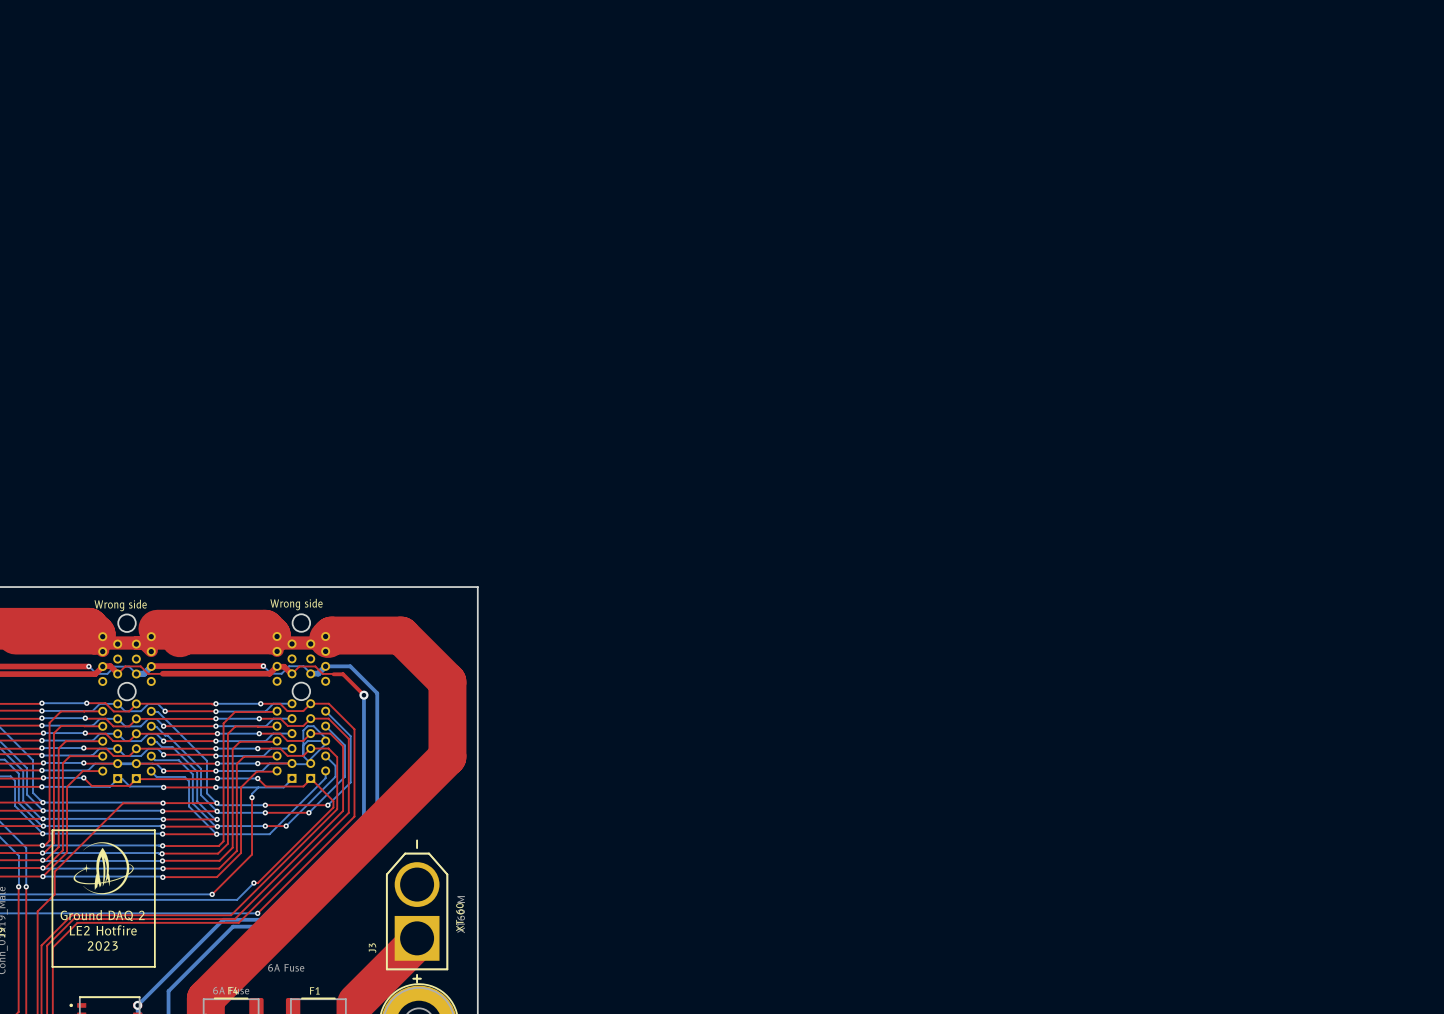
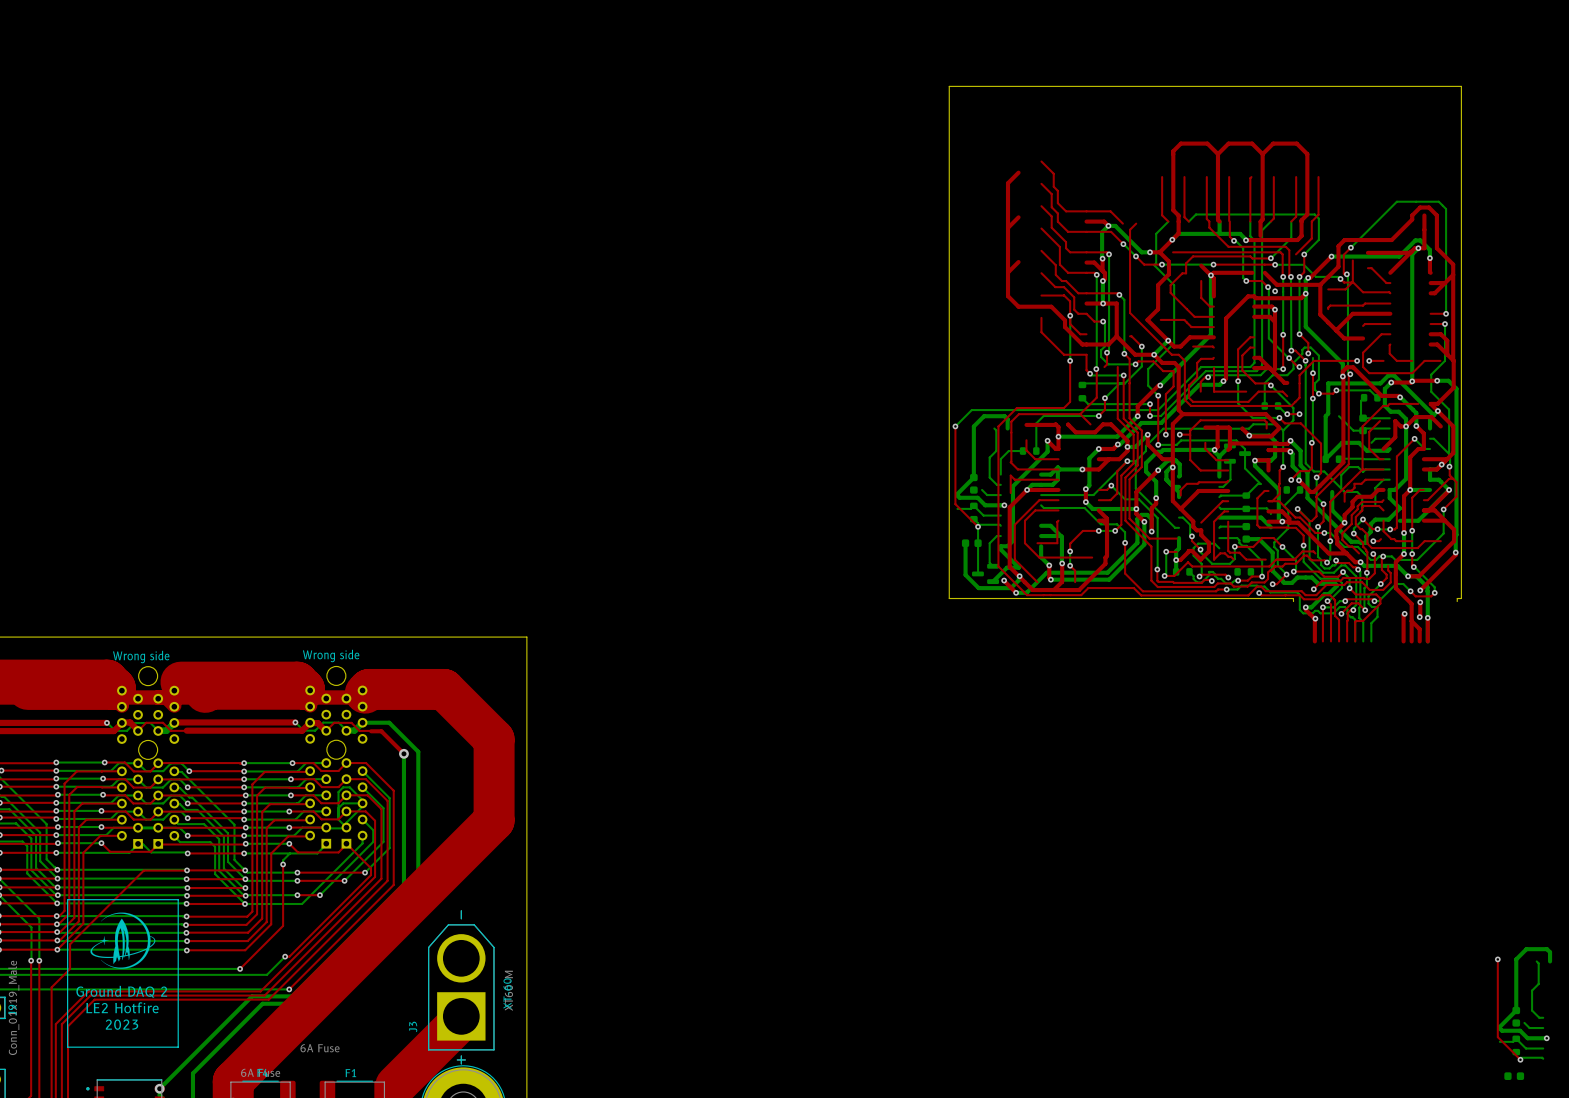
top track: none -> (1217, 154) (1207, 143) (1180, 143) (1173, 151) (1173, 210) (1178, 215) (1178, 233) (1159, 252)
top track: none -> (1217, 154) (1228, 143) (1252, 143) (1262, 154)
top track: none -> (1217, 154) (1217, 219) (1219, 221)
top track: none -> (1262, 154) (1273, 143) (1296, 143) (1307, 154) (1307, 214) (1301, 220) (1301, 235)
top track: none -> (1262, 154) (1262, 219) (1260, 221) (1260, 235)
top track: none -> (1041, 161) (1053, 173) (1053, 186) (1057, 190) (1057, 203) (1066, 211) (1110, 211) (1122, 223)
top track: none -> (1018, 172) (1008, 183) (1008, 296) (1018, 306) (1051, 306) (1065, 320) (1065, 327) (1082, 344) (1108, 344) (1116, 336)
top track: none -> (1162, 177) (1162, 215) (1168, 221)
top track: none -> (1184, 177) (1184, 217) (1188, 221)
top track: none -> (1206, 177) (1206, 219) (1209, 221) (1209, 227) (1228, 246) (1285, 246) (1289, 250) (1289, 275) (1290, 276)
top track: none -> (1229, 177) (1229, 220)
top track: none -> (1251, 177) (1250, 221)
top track: none -> (1273, 177) (1273, 218) (1270, 221)
top track: none -> (1296, 177) (1296, 216) (1291, 221)
top track: none -> (1318, 177) (1318, 214) (1311, 221) (1311, 238) (1295, 254)
top track: none -> (1041, 183) (1051, 194) (1051, 207) (1057, 213) (1057, 221) (1068, 231) (1111, 231) (1123, 244)
top track: none -> (1041, 206) (1051, 216) (1051, 227) (1066, 242) (1066, 248) (1070, 252) (1107, 252) (1109, 254)
top track: none -> (1424, 215) (1424, 248) (1414, 248) (1390, 272)
top track: none -> (1018, 217) (1008, 227)
top track: none -> (1086, 221) (1104, 221) (1108, 225)
bottom track: none -> (1168, 221) (1156, 233) (1156, 263) (1154, 265) (1174, 285) (1174, 343) (1148, 369) (1148, 385) (1158, 395)
bottom track: none -> (1188, 221) (1195, 214) (1314, 214) (1318, 218) (1318, 239) (1304, 254)
bottom track: none -> (1219, 221) (1219, 233)
top track: none -> (1229, 221) (1229, 236) (1234, 240)
bottom track: none -> (1250, 221) (1250, 236) (1254, 240) (1254, 362) (1250, 367) (1201, 367) (1158, 410) (971, 410) (955, 426)
bottom track: none -> (1270, 221) (1262, 230) (1262, 365) (1256, 371) (1205, 371) (1160, 415) (1150, 415)
bottom track: none -> (1291, 221) (1291, 238) (1270, 258)
top track: none -> (1136, 223) (1130, 229) (1130, 312) (1171, 354) (1178, 354) (1184, 360) (1184, 399) (1191, 405) (1291, 405) (1299, 397) (1299, 375) (1313, 360) (1357, 360)
via: none -> (1108, 225)
top track: none -> (1041, 228) (1059, 246) (1059, 264) (1068, 272) (1094, 272) (1096, 274)
top track: none -> (1301, 235) (1297, 240) (1246, 240)
bottom track: none -> (1172, 239) (1178, 233) (1240, 233) (1246, 240)
via: none -> (1172, 239)
via: none -> (1246, 240)
bottom track: none -> (1234, 240) (1243, 248) (1243, 277) (1246, 281)
via: none -> (1234, 240)
bottom track: none -> (1123, 244) (1135, 256)
via: none -> (1123, 244)
top track: none -> (1350, 247) (1343, 254) (1343, 273) (1346, 274)
bottom track: none -> (1350, 247) (1396, 201) (1438, 201) (1446, 208) (1446, 313)
via: none -> (1350, 247)
bottom track: none -> (1418, 248) (1412, 254) (1412, 381)
via: none -> (1418, 248)
top track: none -> (1041, 250) (1055, 265) (1055, 274) (1061, 281) (1066, 281) (1078, 293) (1117, 293) (1119, 294)
top track: none -> (1150, 252) (1159, 252)
bottom track: none -> (1150, 252) (1141, 252) (1115, 225) (1108, 225) (1102, 232) (1102, 258)
via: none -> (1150, 252)
top track: none -> (1159, 252) (1168, 261) (1168, 274) (1158, 285) (1158, 309) (1147, 319) (1174, 346) (1180, 346) (1189, 337) (1213, 337)
top track: none -> (1173, 252) (1280, 252) (1282, 254) (1283, 276)
top track: none -> (1367, 252) (1410, 252)
bottom track: none -> (1109, 254) (1109, 350) (1107, 352)
via: none -> (1109, 254)
top track: none -> (1304, 254) (1304, 272) (1299, 276)
via: none -> (1304, 254)
top track: none -> (1135, 256) (1144, 264) (1162, 264)
via: none -> (1135, 256)
top track: none -> (1331, 256) (1308, 277)
bottom track: none -> (1331, 256) (1399, 256) (1415, 240) (1420, 240) (1429, 249) (1429, 258)
via: none -> (1331, 256)
top track: none -> (1102, 258) (1102, 270)
via: none -> (1102, 258)
top track: none -> (1270, 258) (1193, 256) (1186, 263) (1186, 273) (1182, 273) (1170, 285) (1170, 292) (1194, 316) (1213, 316)
via: none -> (1270, 258)
top track: none -> (1429, 258) (1430, 272)
via: none -> (1429, 258)
top track: none -> (1352, 260) (1352, 282)
top track: none -> (1018, 262) (1008, 272)
top track: none -> (1086, 262) (1094, 262) (1104, 273) (1102, 281)
bottom track: none -> (1162, 264) (1213, 264)
via: none -> (1162, 264)
top track: none -> (1213, 264) (1275, 264)
via: none -> (1213, 264)
bottom track: none -> (1275, 264) (1303, 264) (1315, 276) (1338, 276) (1340, 278)
via: none -> (1275, 264)
top track: none -> (1201, 265) (1213, 278) (1213, 296)
top track: none -> (1367, 268) (1371, 268) (1386, 283) (1390, 283)
top track: none -> (1252, 272) (1213, 272) (1210, 275)
top track: none -> (1264, 272) (1276, 284) (1320, 284)
top track: none -> (1041, 273) (1055, 287) (1063, 287) (1074, 297) (1074, 309) (1078, 313) (1086, 313) (1094, 321) (1103, 321)
bottom track: none -> (1096, 274) (1096, 369)
via: none -> (1096, 274)
bottom track: none -> (1346, 274) (1347, 371) (1350, 374)
via: none -> (1346, 274)
top track: none -> (1453, 274) (1434, 293) (1430, 293)
bottom track: none -> (1210, 275) (1210, 334) (1160, 385)
via: none -> (1210, 275)
bottom track: none -> (1283, 276) (1283, 334)
via: none -> (1283, 276)
bottom track: none -> (1290, 276) (1291, 350)
via: none -> (1290, 276)
bottom track: none -> (1299, 276) (1299, 334)
via: none -> (1299, 276)
bottom track: none -> (1308, 277) (1305, 280) (1305, 326) (1342, 363) (1342, 376)
via: none -> (1308, 277)
top track: none -> (1340, 278) (1344, 282) (1352, 282)
via: none -> (1340, 278)
bottom track: none -> (1102, 281) (1103, 303)
via: none -> (1102, 281)
top track: none -> (1201, 281) (1201, 297) (1209, 306) (1213, 306)
top track: none -> (1246, 281) (1261, 281) (1268, 287)
via: none -> (1246, 281)
top track: none -> (1352, 282) (1345, 289) (1328, 289)
top track: none -> (1352, 282) (1363, 292) (1390, 293)
top track: none -> (1430, 283) (1445, 283)
top track: none -> (1320, 284) (1320, 314) (1344, 338) (1363, 338)
top track: none -> (1320, 284) (1338, 266) (1338, 246) (1344, 240) (1391, 240) (1412, 219) (1412, 215) (1420, 207) (1428, 207) (1436, 215) (1436, 248) (1453, 264) (1453, 360)
bottom track: none -> (1268, 287) (1268, 338) (1289, 358)
via: none -> (1268, 287)
via: none -> (1275, 291)
top track: none -> (1305, 293) (1301, 298) (1256, 298) (1248, 296) (1226, 318) (1226, 378) (1223, 381)
via: none -> (1305, 293)
top track: none -> (1041, 295) (1063, 295) (1070, 301) (1070, 324) (1080, 334) (1086, 334)
bottom track: none -> (1119, 294) (1124, 299) (1124, 353)
via: none -> (1119, 294)
top track: none -> (1086, 303) (1116, 303) (1116, 336)
via: none -> (1103, 303)
top track: none -> (1390, 303) (1330, 305) (1328, 309)
top track: none -> (1254, 306) (1271, 306) (1274, 309) (1274, 369) (1272, 371)
via: none -> (1274, 309)
top track: none -> (1390, 313) (1352, 313) (1336, 330)
top track: none -> (1430, 313) (1446, 313)
via: none -> (1446, 313)
bottom track: none -> (1070, 315) (1070, 360)
via: none -> (1070, 315)
top track: none -> (1254, 316) (1269, 316) (1274, 321)
top track: none -> (1041, 317) (1041, 332) (1063, 354) (1086, 354) (1086, 370) (1090, 373)
top track: none -> (1160, 319) (1184, 319) (1191, 327) (1213, 327)
bottom track: none -> (1103, 321) (1104, 323) (1104, 346) (1101, 350) (1101, 357) (1108, 364) (1135, 364)
via: none -> (1103, 321)
top track: none -> (1390, 324) (1365, 324) (1363, 325)
top track: none -> (1430, 324) (1445, 324)
bottom track: none -> (1445, 324) (1445, 360) (1431, 374) (1431, 391) (1449, 409) (1449, 453)
via: none -> (1445, 324)
top track: none -> (1299, 334) (1308, 342) (1308, 353)
via: none -> (1299, 334)
top track: none -> (1390, 334) (1381, 334) (1363, 352) (1363, 367) (1369, 373) (1412, 373) (1424, 360) (1440, 360)
top track: none -> (1430, 334) (1440, 334) (1447, 340) (1447, 354)
top track: none -> (1283, 334) (1283, 369)
via: none -> (1283, 334)
top track: none -> (1116, 336) (1135, 354) (1154, 354) (1162, 362) (1174, 362) (1178, 367) (1178, 410) (1182, 414)
top track: none -> (1130, 336) (1141, 346)
top track: none -> (1254, 337) (1250, 337) (1238, 349) (1238, 381)
bottom track: none -> (1168, 340) (1154, 354)
via: none -> (1168, 340)
top track: none -> (1390, 344) (1389, 353) (1396, 360) (1412, 360)
top track: none -> (1430, 344) (1437, 344) (1453, 360) (1453, 387) (1437, 403) (1430, 403) (1453, 426) (1453, 452) (1436, 469) (1423, 469)
bottom track: none -> (1141, 346) (1141, 366) (1124, 383) (1082, 384)
via: none -> (1141, 346)
top track: none -> (1193, 346) (1213, 347)
top track: none -> (1254, 347) (1250, 347) (1242, 355) (1242, 370) (1255, 383) (1268, 383) (1270, 385)
top track: none -> (1291, 350) (1295, 350) (1305, 360)
via: none -> (1291, 350)
top track: none -> (1107, 352) (1107, 364) (1104, 367)
via: none -> (1107, 352)
top track: none -> (1124, 353) (1129, 359) (1129, 383)
via: none -> (1124, 353)
via: none -> (1308, 353)
via: none -> (1154, 354)
top track: none -> (1213, 357) (1201, 358) (1197, 362) (1197, 377) (1188, 385) (1188, 397) (1193, 401) (1248, 401) (1258, 391) (1282, 391) (1287, 396)
top track: none -> (1254, 357) (1259, 357) (1284, 382) (1287, 382)
top track: none -> (1289, 358) (1299, 366)
via: none -> (1289, 358)
bottom track: none -> (1312, 357) (1312, 373)
top track: none -> (1070, 360) (1070, 401) (1063, 408) (1016, 408) (998, 426) (998, 566) (1026, 595) (1081, 595) (1088, 588) (1133, 588) (1141, 595) (1248, 595) (1257, 586) (1261, 586) (1265, 591) (1301, 591) (1305, 595) (1316, 595) (1326, 584) (1344, 584) (1347, 582) (1362, 582) (1369, 589) (1383, 589) (1390, 582) (1388, 565)
via: none -> (1070, 360)
via: none -> (1305, 360)
via: none -> (1357, 360)
top track: none -> (1369, 360) (1383, 360)
via: none -> (1369, 360)
top track: none -> (1135, 364) (1138, 361) (1153, 361) (1163, 371) (1173, 371) (1173, 386) (1165, 394) (1165, 434)
via: none -> (1135, 364)
bottom track: none -> (1305, 364) (1305, 463) (1313, 471) (1324, 471) (1344, 492) (1357, 492) (1362, 496) (1362, 509) (1360, 511)
top track: none -> (1117, 367) (1117, 418) (1133, 434) (1133, 463) (1121, 475) (1121, 524) (1115, 530)
via: none -> (1299, 366)
top track: none -> (1213, 368) (1214, 391) (1246, 391)
top track: none -> (1254, 368) (1269, 368)
top track: none -> (1096, 369) (1096, 397) (1080, 414)
via: none -> (1096, 369)
bottom track: none -> (1283, 369) (1266, 369) (1260, 375) (1210, 375) (1208, 377)
via: none -> (1283, 369)
top track: none -> (1312, 373) (1312, 398)
via: none -> (1312, 373)
bottom track: none -> (1090, 373) (1091, 375) (1123, 375)
via: none -> (1090, 373)
top track: none -> (1350, 374) (1348, 372) (1348, 464) (1316, 496) (1316, 516) (1311, 521) (1297, 509)
via: none -> (1350, 374)
top track: none -> (1123, 375) (1123, 418) (1137, 432) (1137, 465) (1125, 477) (1125, 520) (1151, 546) (1151, 580) (1157, 587) (1160, 587)
via: none -> (1123, 375)
via: none -> (1342, 376)
top track: none -> (1208, 377) (1200, 381) (1200, 391)
via: none -> (1208, 377)
top track: none -> (1437, 380) (1391, 382)
bottom track: none -> (1437, 380) (1448, 380) (1456, 388) (1455, 552)
via: none -> (1437, 380)
bottom track: none -> (1223, 381) (1219, 384) (1199, 384) (1161, 422) (1141, 422) (1120, 444) (1117, 444)
via: none -> (1223, 381)
bottom track: none -> (1238, 381) (1238, 403) (1252, 417) (1279, 417)
via: none -> (1238, 381)
via: none -> (1412, 381)
bottom track: none -> (1391, 382) (1384, 388) (1384, 405) (1390, 411) (1398, 411) (1406, 419) (1406, 478) (1395, 489) (1389, 489) (1389, 498) (1399, 508) (1388, 519) (1375, 519) (1370, 524) (1370, 532) (1366, 536) (1366, 542) (1351, 541) (1307, 497) (1307, 472) (1300, 465) (1300, 450) (1290, 440)
via: none -> (1391, 382)
bottom track: none -> (1119, 383) (1104, 398)
top track: none -> (1129, 383) (1129, 418) (1141, 430) (1141, 467) (1129, 479) (1129, 518) (1149, 538) (1176, 538)
top track: none -> (1160, 385) (1137, 406) (1137, 416)
via: none -> (1160, 385)
bottom track: none -> (1270, 385) (1293, 408) (1293, 420) (1283, 430)
via: none -> (1270, 385)
top track: none -> (1336, 390) (1333, 393) (1318, 393)
bottom track: none -> (1336, 390) (1370, 390) (1377, 397)
via: none -> (1336, 390)
part: none -> (1082, 391)
bottom track: none -> (1318, 393) (1314, 389) (1314, 383) (1318, 379) (1318, 355) (1310, 347) (1304, 347) (1302, 354) (1293, 362) (1293, 368) (1287, 375) (1272, 375) (1264, 383) (1264, 405)
via: none -> (1318, 393)
top track: none -> (1158, 395) (1158, 444)
via: none -> (1158, 395)
bottom track: none -> (1082, 398) (1088, 404) (1150, 404)
top track: none -> (1104, 398) (1104, 409) (1098, 415)
via: none -> (1104, 398)
bottom track: none -> (1364, 397) (1361, 400) (1361, 416) (1363, 418) (1389, 418)
part: none -> (1370, 397)
top track: none -> (1400, 397) (1381, 395) (1353, 367) (1346, 367) (1342, 371) (1343, 462) (1313, 491) (1310, 491) (1298, 480)
bottom track: none -> (1400, 397) (1416, 413) (1416, 426)
via: none -> (1400, 397)
bottom track: none -> (1312, 398) (1311, 442)
via: none -> (1312, 398)
top track: none -> (1150, 404) (1150, 415)
via: none -> (1150, 404)
top track: none -> (1418, 403) (1389, 403) (1383, 405) (1362, 426) (1362, 469)
part: none -> (1271, 405)
bottom track: none -> (1278, 405) (1287, 414)
bottom track: none -> (1437, 411) (1430, 418) (1430, 428)
via: none -> (1437, 411)
top track: none -> (1080, 414) (1018, 414) (1011, 421) (1010, 462) (1017, 469) (1058, 469)
top track: none -> (1080, 414) (1090, 424)
top track: none -> (1182, 414) (1172, 424) (1172, 500) (1193, 521) (1193, 526) (1196, 530) (1201, 530) (1201, 535) (1208, 542) (1208, 551) (1200, 559) (1192, 550) (1188, 550) (1180, 560) (1176, 560)
top track: none -> (1182, 414) (1265, 414) (1279, 427)
top track: none -> (1287, 414) (1299, 414)
via: none -> (1287, 414)
via: none -> (1299, 414)
bottom track: none -> (1433, 415) (1394, 375) (1388, 375) (1380, 383) (1328, 383) (1325, 459) (1342, 442) (1358, 442) (1366, 450) (1387, 450) (1389, 448)
bottom track: none -> (1098, 415) (1043, 415) (1036, 423) (1036, 451)
via: none -> (1098, 415)
bottom track: none -> (1137, 416) (1117, 436) (1058, 436)
via: none -> (1137, 416)
via: none -> (1150, 415)
bottom track: none -> (1338, 416) (1353, 430) (1389, 428)
top track: none -> (1279, 417) (1284, 423) (1300, 423) (1321, 443) (1321, 473) (1316, 477)
via: none -> (1279, 417)
top track: none -> (1379, 421) (1369, 431) (1369, 448) (1379, 459) (1383, 459)
top track: none -> (1026, 424) (1055, 424) (1058, 427) (1058, 448) (1055, 448) (1047, 440)
top track: none -> (1068, 424) (1075, 432) (1095, 432) (1103, 424) (1111, 424) (1127, 440) (1127, 451) (1119, 459) (1098, 459)
part: none -> (1363, 424)
top track: none -> (955, 426) (955, 504) (978, 526)
via: none -> (955, 426)
via: none -> (1406, 426)
top track: none -> (1416, 426) (1423, 433) (1423, 448) (1418, 448) (1410, 457) (1410, 489) (1404, 496) (1404, 532)
via: none -> (1416, 426)
top track: none -> (1440, 426) (1431, 417) (1415, 417) (1406, 426) (1400, 426) (1395, 421) (1395, 437) (1383, 448)
top track: none -> (1205, 427) (1228, 427) (1229, 448) (1228, 450)
top track: none -> (1217, 427) (1217, 446) (1214, 449)
bottom track: none -> (994, 428) (996, 430) (996, 451) (989, 457) (989, 477) (996, 484) (1000, 484)
bottom track: none -> (1007, 428) (1007, 419) (1004, 416) (984, 416) (973, 426) (973, 477) (957, 493) (959, 497) (977, 497) (985, 505) (1004, 505)
top track: none -> (1242, 428) (1250, 436) (1271, 436) (1279, 428)
top track: none -> (1266, 428) (1264, 420) (1200, 420) (1190, 430) (1190, 459) (1200, 470) (1228, 470)
bottom track: none -> (1283, 430) (1276, 424) (1253, 424) (1248, 428) (1163, 428) (1145, 446) (1145, 451) (1135, 461)
bottom track: none -> (1283, 430) (1283, 467)
top track: none -> (1147, 434) (1147, 444) (1162, 459) (1172, 459)
bottom track: none -> (1147, 434) (1135, 446) (1127, 446)
via: none -> (1147, 434)
via: none -> (1165, 434)
top track: none -> (1179, 434) (1190, 435)
via: none -> (1179, 434)
bottom track: none -> (1249, 435) (1269, 435) (1275, 441) (1275, 456) (1271, 460) (1254, 460) (1254, 465) (1278, 489) (1278, 519)
via: none -> (1249, 435)
via: none -> (1058, 436)
bottom track: none -> (1389, 438) (1375, 438) (1371, 442)
top track: none -> (1414, 438) (1396, 456) (1396, 527) (1390, 529)
bottom track: none -> (1414, 438) (1424, 448) (1430, 448)
via: none -> (1414, 438)
bottom track: none -> (1430, 438) (1433, 438) (1451, 455) (1449, 466)
top track: none -> (1026, 440) (1026, 450) (1035, 459) (1058, 459)
bottom track: none -> (1047, 440) (1047, 451) (1012, 486) (1012, 540) (1007, 546) (1000, 546) (1000, 549) (1018, 567) (1006, 567) (993, 581)
via: none -> (1047, 440)
top track: none -> (1290, 440) (1287, 443) (1229, 442)
via: none -> (1290, 440)
top track: none -> (1205, 442) (1205, 448) (1216, 460) (1228, 460)
top track: none -> (1311, 442) (1311, 468) (1308, 471) (1299, 471) (1291, 479)
via: none -> (1311, 442)
top track: none -> (1117, 444) (1113, 448) (1098, 448)
via: none -> (1117, 444)
bottom track: none -> (1158, 444) (1176, 444) (1181, 440) (1236, 440) (1245, 449) (1245, 468) (1260, 484) (1257, 484) (1246, 495) (1219, 497)
via: none -> (1158, 444)
via: none -> (1127, 446)
bottom track: none -> (1229, 445) (1219, 456)
bottom track: none -> (1098, 448) (1089, 458) (1089, 485) (1085, 489)
via: none -> (1098, 448)
bottom track: none -> (1178, 449) (1214, 449) (1219, 456)
bottom track: none -> (1178, 450) (1157, 451) (1146, 463) (1146, 471) (1156, 481) (1156, 498)
via: none -> (1214, 449)
top track: none -> (1268, 450) (1290, 451)
bottom track: none -> (1023, 451) (1008, 451) (1000, 459) (1000, 474)
part: none -> (1029, 451)
bottom track: none -> (1290, 451) (1292, 453) (1292, 466) (1298, 472) (1298, 480)
via: none -> (1290, 451)
part: none -> (1237, 453)
bottom track: none -> (1219, 456) (1219, 476)
top track: none -> (1109, 459) (1098, 469) (1082, 469)
part: none -> (1332, 459)
bottom track: none -> (1338, 459) (1389, 459)
top track: none -> (1423, 459) (1447, 459)
top track: none -> (1254, 460) (1268, 460) (1268, 470)
via: none -> (1254, 460)
top track: none -> (1127, 461) (1117, 471) (1117, 493) (1110, 500) (1098, 500)
via: none -> (1127, 461)
bottom track: none -> (1135, 461) (1135, 488) (1175, 527) (1179, 527)
bottom track: none -> (1135, 461) (1127, 461) (1093, 495) (1041, 495)
bottom track: none -> (1229, 461) (1230, 479) (1223, 486) (1219, 486)
bottom track: none -> (1441, 464) (1436, 469) (1430, 469) (1430, 479) (1438, 479) (1449, 489) (1418, 520) (1399, 520)
via: none -> (1441, 464)
bottom track: none -> (1057, 467) (1059, 469) (1082, 469)
bottom track: none -> (1057, 467) (1057, 479) (1052, 484) (1032, 484) (1027, 489)
bottom track: none -> (1057, 467) (1050, 474) (1041, 474)
bottom track: none -> (1172, 467) (1166, 471) (1166, 479) (1179, 492) (1179, 497)
via: none -> (1172, 467)
top track: none -> (1283, 467) (1279, 470) (1279, 493) (1272, 501)
via: none -> (1283, 467)
top track: none -> (1449, 466) (1449, 475) (1453, 478)
via: none -> (1449, 466)
via: none -> (1082, 469)
top track: none -> (1362, 469) (1383, 469)
top track: none -> (1362, 469) (1330, 501) (1330, 541)
bottom track: none -> (1389, 469) (1365, 469) (1363, 472) (1358, 467) (1349, 467) (1341, 475) (1341, 488)
top track: none -> (1158, 470) (1136, 492) (1136, 513) (1144, 521)
bottom track: none -> (1158, 470) (1167, 460) (1175, 460) (1179, 464) (1179, 476)
via: none -> (1158, 470)
bottom track: none -> (1316, 477) (1316, 497) (1323, 504)
via: none -> (1316, 477)
top track: none -> (1453, 478) (1456, 482) (1456, 496) (1443, 509)
top track: none -> (1453, 478) (1449, 478) (1427, 500) (1423, 500)
top track: none -> (1058, 479) (1014, 479) (1010, 475) (1010, 493)
via: none -> (1291, 479)
via: none -> (1298, 480)
top track: none -> (1383, 479) (1365, 479) (1361, 483) (1354, 483) (1354, 487) (1351, 490) (1347, 490) (1344, 493) (1344, 501)
bottom track: none -> (1389, 479) (1383, 479) (1375, 487) (1375, 504)
top track: none -> (1228, 480) (1186, 483) (1180, 489) (1180, 495)
part: none -> (973, 483)
top track: none -> (1111, 485) (1107, 489) (1098, 489)
bottom track: none -> (1111, 485) (1124, 499) (1138, 499) (1157, 518) (1157, 569)
via: none -> (1111, 485)
bottom track: none -> (1173, 486) (1179, 486)
bottom track: none -> (982, 489) (987, 495) (1000, 495)
via: none -> (1027, 489)
top track: none -> (1058, 489) (1027, 489) (1009, 507) (1009, 566) (1032, 590) (1041, 590)
top track: none -> (1085, 489) (1085, 502)
via: none -> (1085, 489)
part: none -> (1293, 489)
bottom track: none -> (1300, 489) (1283, 506) (1288, 510) (1288, 528) (1274, 542) (1274, 547) (1277, 550) (1277, 565) (1286, 574)
top track: none -> (1383, 489) (1378, 489) (1371, 496) (1357, 496) (1352, 501) (1352, 507) (1344, 515) (1344, 522) (1336, 530) (1337, 544) (1355, 562) (1360, 562)
bottom track: none -> (1410, 489) (1430, 489)
via: none -> (1410, 489)
top track: none -> (1423, 489) (1420, 489) (1412, 497) (1412, 530)
top track: none -> (1449, 489) (1429, 510)
via: none -> (1449, 489)
top track: none -> (1228, 490) (1198, 490) (1180, 508)
top track: none -> (1268, 490) (1264, 490) (1257, 498) (1257, 525) (1259, 527) (1295, 527) (1303, 535) (1303, 545)
bottom track: none -> (1332, 492) (1332, 510) (1344, 522)
top track: none -> (1156, 498) (1156, 503) (1151, 508) (1151, 531)
via: none -> (1156, 498)
top track: none -> (1058, 500) (1039, 500) (1014, 524) (1014, 559) (1037, 582)
top track: none -> (1383, 500) (1381, 501) (1362, 501) (1351, 515) (1351, 524) (1342, 533) (1342, 539) (1359, 553)
bottom track: none -> (1085, 502) (1092, 509) (1136, 509)
via: none -> (1085, 502)
top track: none -> (1228, 501) (1222, 501) (1201, 522)
top track: none -> (1268, 501) (1279, 501) (1295, 517) (1300, 517) (1315, 532) (1324, 532)
part: none -> (1246, 502)
top track: none -> (1323, 504) (1323, 521) (1318, 526)
via: none -> (1323, 504)
via: none -> (1004, 505)
bottom track: none -> (1041, 505) (1043, 507) (1084, 507) (1100, 524) (1117, 524) (1125, 532) (1125, 542)
bottom track: none -> (1219, 507) (1266, 508) (1270, 514)
bottom track: none -> (957, 508) (970, 508) (973, 505) (983, 515) (1000, 515)
via: none -> (1136, 509)
bottom track: none -> (1297, 509) (1309, 520) (1309, 559) (1323, 572) (1333, 572) (1341, 565) (1345, 565) (1356, 576) (1356, 604) (1353, 610)
via: none -> (1297, 509)
bottom track: none -> (1443, 509) (1443, 533) (1417, 559) (1395, 559) (1391, 556) (1379, 556) (1375, 559) (1370, 559) (1357, 546) (1344, 546) (1330, 532) (1324, 532)
via: none -> (1443, 509)
top track: none -> (1058, 510) (1035, 510) (1024, 520) (1024, 543) (1039, 557) (1092, 557)
top track: none -> (1098, 510) (1107, 518) (1105, 563) (1079, 590) (1053, 590)
top track: none -> (1383, 510) (1379, 506) (1363, 506) (1355, 517) (1355, 524) (1367, 534) (1367, 543) (1371, 548) (1417, 548) (1424, 541) (1440, 541)
top track: none -> (1423, 510) (1434, 510) (1454, 529) (1454, 541) (1418, 576) (1408, 576)
top track: none -> (1228, 511) (1224, 511) (1214, 521) (1214, 559) (1220, 553) (1224, 553) (1233, 559)
top track: none -> (1268, 511) (1282, 511) (1289, 518) (1289, 522)
part: none -> (973, 512)
bottom track: none -> (1179, 517) (1182, 517) (1190, 524) (1190, 534) (1191, 536)
bottom track: none -> (1219, 517) (1261, 517) (1270, 527)
bottom track: none -> (973, 519) (978, 523) (978, 573)
top track: none -> (1363, 519) (1372, 529) (1377, 529)
bottom track: none -> (1363, 519) (1353, 528) (1353, 533)
via: none -> (1363, 519)
top track: none -> (1058, 520) (1057, 543) (1037, 543)
top track: none -> (1098, 520) (1102, 520) (1107, 524)
top track: none -> (1383, 520) (1383, 531) (1391, 539) (1396, 541) (1412, 541)
top track: none -> (1423, 520) (1445, 520)
bottom track: none -> (1144, 521) (1144, 544) (1109, 579) (1050, 579)
via: none -> (1144, 521)
top track: none -> (1228, 521) (1228, 550) (1230, 552) (1239, 552) (1246, 559) (1265, 559)
top track: none -> (1268, 521) (1289, 522)
via: none -> (1282, 521)
top track: none -> (1289, 522) (1298, 522) (1328, 553) (1346, 553)
via: none -> (1344, 522)
bottom track: none -> (978, 524) (1000, 525)
bottom track: none -> (1041, 525) (1050, 525) (1061, 537) (1062, 563)
via: none -> (978, 526)
bottom track: none -> (1246, 526) (1219, 527)
bottom track: none -> (1318, 526) (1318, 556) (1321, 559) (1321, 564) (1324, 568) (1329, 568) (1336, 564) (1336, 560)
via: none -> (1318, 526)
bottom track: none -> (1377, 529) (1390, 529)
via: none -> (1377, 529)
via: none -> (1390, 529)
top track: none -> (1098, 530) (1082, 530) (1070, 543) (1070, 551)
bottom track: none -> (1098, 530) (1115, 530)
via: none -> (1098, 530)
via: none -> (1115, 530)
bottom track: none -> (1412, 530) (1412, 554)
via: none -> (1412, 530)
bottom track: none -> (1151, 531) (1151, 519) (1147, 514) (1141, 514) (1137, 518) (1137, 542) (1107, 572) (1046, 572) (1026, 592) (1016, 592)
via: none -> (1151, 531)
part: none -> (1246, 532)
via: none -> (1324, 532)
bottom track: none -> (1404, 532) (1404, 554)
via: none -> (1404, 532)
top track: none -> (1353, 533) (1363, 542) (1363, 546) (1367, 552) (1366, 572)
via: none -> (1353, 533)
bottom track: none -> (1000, 536) (996, 536) (989, 543) (989, 562) (993, 566)
bottom track: none -> (1041, 536) (1060, 536)
top track: none -> (1191, 536) (1191, 541) (1200, 549)
via: none -> (1191, 536)
bottom track: none -> (1179, 538) (1179, 548) (1176, 551) (1176, 571)
bottom track: none -> (1219, 538) (1237, 538) (1242, 545) (1246, 545) (1262, 561) (1262, 576)
bottom track: none -> (1246, 539) (1259, 539) (1272, 552) (1272, 570) (1284, 582) (1292, 582) (1297, 577) (1311, 577) (1318, 583) (1336, 585) (1311, 607) (1305, 607)
top track: none -> (1381, 539) (1373, 541)
bottom track: none -> (1330, 541) (1330, 559) (1327, 562)
via: none -> (1330, 541)
via: none -> (1373, 541)
top track: none -> (1125, 542) (1125, 573) (1142, 591) (1216, 591) (1226, 589)
via: none -> (1125, 542)
bottom track: none -> (965, 543) (965, 574) (978, 588) (1011, 588) (1018, 580) (1019, 576)
part: none -> (971, 543)
bottom track: none -> (1041, 546) (1041, 557) (1049, 565)
bottom track: none -> (1303, 545) (1303, 561) (1320, 578) (1337, 578) (1342, 583) (1342, 588) (1327, 601)
via: none -> (1303, 545)
top track: none -> (1234, 546) (1253, 546) (1262, 538) (1273, 538) (1282, 546)
bottom track: none -> (1234, 546) (1234, 558) (1229, 563) (1212, 563) (1200, 552) (1200, 549)
via: none -> (1234, 546)
bottom track: none -> (1282, 546) (1296, 560) (1296, 569) (1293, 571)
via: none -> (1282, 546)
bottom track: none -> (1219, 548) (1214, 543) (1198, 543) (1193, 548) (1193, 555) (1201, 563) (1201, 574) (1199, 576)
via: none -> (1200, 549)
bottom track: none -> (1070, 551) (1070, 565)
via: none -> (1070, 551)
top track: none -> (1166, 551) (1176, 551)
bottom track: none -> (1166, 551) (1166, 574) (1164, 575)
via: none -> (1166, 551)
top track: none -> (1455, 552) (1455, 554) (1420, 590)
via: none -> (1455, 552)
top track: none -> (1315, 553) (1313, 551) (1302, 551) (1294, 559) (1276, 559) (1269, 566) (1192, 566) (1188, 562) (1174, 575) (1164, 575)
top track: none -> (1373, 554) (1374, 573) (1369, 578) (1343, 577) (1340, 580) (1322, 580) (1313, 589)
via: none -> (1373, 554)
top track: none -> (1404, 554) (1395, 562) (1395, 588) (1411, 603) (1411, 641)
via: none -> (1404, 554)
top track: none -> (1412, 554) (1413, 567)
via: none -> (1412, 554)
top track: none -> (1383, 556) (1381, 569) (1386, 574) (1386, 578) (1380, 584)
via: none -> (1383, 556)
via: none -> (1176, 560)
top track: none -> (1336, 560) (1336, 563) (1348, 563) (1358, 569)
via: none -> (1336, 560)
top track: none -> (1327, 562) (1324, 560) (1311, 560) (1304, 555) (1296, 563) (1275, 566) (1268, 572) (1268, 578) (1264, 582) (1251, 582) (1247, 586) (1217, 583) (1214, 586) (1160, 586)
via: none -> (1327, 562)
bottom track: none -> (1360, 562) (1364, 565) (1397, 565) (1408, 576) (1416, 576) (1427, 587) (1427, 641)
via: none -> (1360, 562)
top track: none -> (1062, 563) (1062, 581) (1053, 590) (1041, 590)
via: none -> (1062, 563)
top track: none -> (1049, 565) (1050, 579)
via: none -> (1049, 565)
top track: none -> (1070, 565) (1075, 570) (1075, 582)
via: none -> (1070, 565)
bottom track: none -> (1413, 567) (1434, 587) (1434, 592)
via: none -> (1413, 567)
top track: none -> (1157, 569) (1158, 581) (1201, 582) (1204, 579) (1211, 581)
via: none -> (1157, 569)
bottom track: none -> (1358, 569) (1360, 571) (1359, 618) (1363, 622) (1363, 641)
via: none -> (1358, 569)
part: none -> (1182, 571)
bottom track: none -> (1189, 571) (1197, 582) (1201, 582) (1209, 575) (1209, 571) (1212, 571) (1217, 578) (1221, 578) (1225, 583) (1238, 580)
part: none -> (1244, 571)
top track: none -> (1293, 571) (1319, 571) (1324, 576) (1338, 576) (1343, 572)
via: none -> (1293, 571)
bottom track: none -> (1343, 572) (1349, 578) (1349, 588)
via: none -> (1343, 572)
bottom track: none -> (1366, 572) (1366, 585) (1364, 588) (1365, 610)
via: none -> (1366, 572)
part: none -> (985, 573)
top track: none -> (1286, 574) (1276, 584) (1272, 584)
via: none -> (1286, 574)
via: none -> (1019, 576)
via: none -> (1164, 575)
top track: none -> (1199, 576) (1201, 574) (1225, 574) (1228, 577)
via: none -> (1199, 576)
top track: none -> (1262, 576) (1251, 576) (1247, 580) (1238, 580)
via: none -> (1262, 576)
via: none -> (1408, 576)
via: none -> (1228, 577)
via: none -> (1050, 579)
top track: none -> (1004, 580) (1016, 592)
via: none -> (1004, 580)
via: none -> (1238, 580)
via: none -> (1211, 581)
bottom track: none -> (1380, 584) (1368, 596) (1368, 603) (1372, 607) (1377, 607) (1377, 617) (1371, 623) (1371, 641)
via: none -> (1380, 584)
via: none -> (1272, 584)
top track: none -> (1349, 588) (1355, 594) (1376, 594) (1380, 598) (1380, 603) (1362, 621) (1355, 622) (1355, 641)
via: none -> (1349, 588)
bottom track: none -> (1226, 589) (1237, 589) (1241, 585) (1257, 585) (1264, 586) (1270, 592) (1297, 592) (1299, 595) (1299, 609) (1303, 613) (1312, 613) (1315, 610) (1320, 613) (1333, 613) (1339, 607) (1344, 607) (1347, 613) (1355, 619) (1355, 641)
via: none -> (1226, 589)
via: none -> (1313, 589)
via: none -> (1420, 590)
top track: none -> (1410, 591) (1415, 596) (1431, 596) (1434, 592)
bottom track: none -> (1410, 591) (1403, 584) (1396, 584) (1378, 601) (1374, 601)
via: none -> (1410, 591)
via: none -> (1016, 592)
top track: none -> (1259, 593) (1261, 595) (1285, 595)
via: none -> (1259, 593)
via: none -> (1434, 592)
top track: none -> (1285, 595) (1299, 595) (1303, 599) (1317, 599) (1322, 595) (1329, 595) (1335, 600) (1335, 615) (1339, 619) (1339, 641)
top track: none -> (1327, 601) (1331, 604) (1331, 641)
via: none -> (1327, 601)
top track: none -> (1345, 601) (1347, 599) (1372, 599) (1374, 601)
bottom track: none -> (1345, 601) (1339, 601) (1333, 607) (1322, 607)
via: none -> (1345, 601)
via: none -> (1374, 601)
board edge: none -> (1293, 601) (1293, 598) (949, 598) (949, 86) (1461, 86) (1461, 598) (1457, 598) (1457, 601)
top track: none -> (1420, 602) (1419, 617)
via: none -> (1420, 602)
top track: none -> (1305, 607) (1305, 609) (1315, 618) (1314, 641)
via: none -> (1305, 607)
top track: none -> (1322, 607) (1322, 641)
via: none -> (1322, 607)
top track: none -> (1353, 610) (1347, 613) (1347, 641)
via: none -> (1353, 610)
top track: none -> (1365, 610) (1358, 603) (1351, 603) (1341, 613)
via: none -> (1365, 610)
via: none -> (1341, 613)
top track: none -> (1404, 613) (1403, 641)
via: none -> (1404, 613)
via: none -> (1419, 617)
via: none -> (1315, 618)
top track: none -> (1427, 617) (1427, 641)
via: none -> (1427, 617)
top track: none -> (1411, 621) (1419, 629) (1419, 641)
top track: none -> (1497, 959) (1497, 1037) (1520, 1059)
via: none -> (1497, 959)
bottom track: none -> (1536, 961) (1538, 963) (1538, 983) (1532, 990) (1532, 1010) (1539, 1017) (1543, 1017)
bottom track: none -> (1550, 961) (1550, 952) (1546, 949) (1526, 949) (1516, 959) (1516, 1010) (1499, 1026) (1502, 1030) (1520, 1030) (1527, 1038) (1546, 1038)
part: none -> (1516, 1016)
bottom track: none -> (1524, 1022) (1529, 1028) (1543, 1028)
via: none -> (1546, 1038)
bottom track: none -> (1499, 1041) (1513, 1041) (1516, 1038) (1525, 1048) (1543, 1048)
part: none -> (1516, 1045)
bottom track: none -> (1520, 1057) (1543, 1058)
via: none -> (1520, 1059)
part: none -> (1514, 1076)

